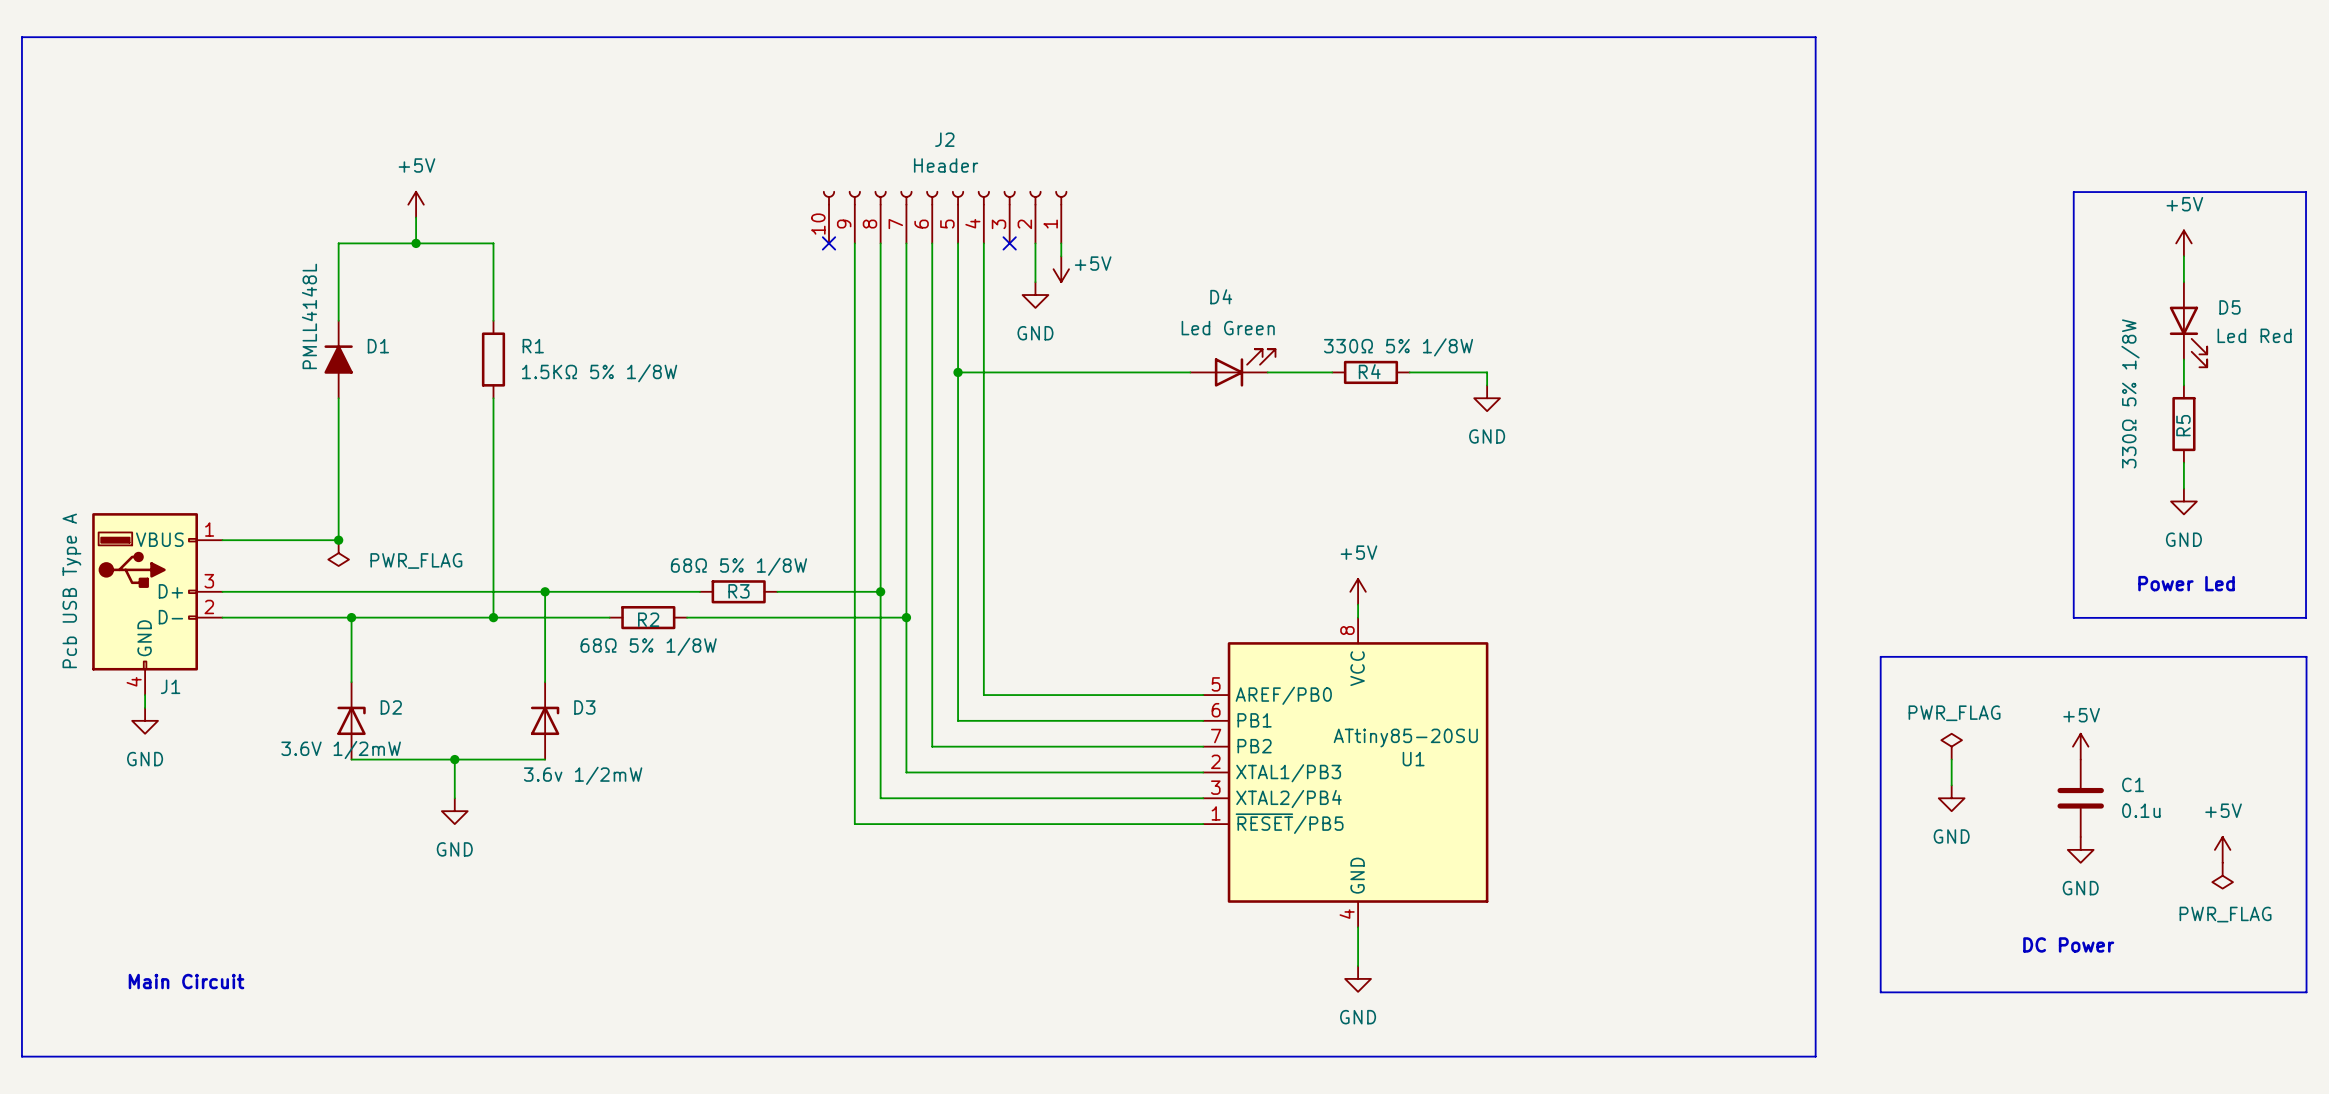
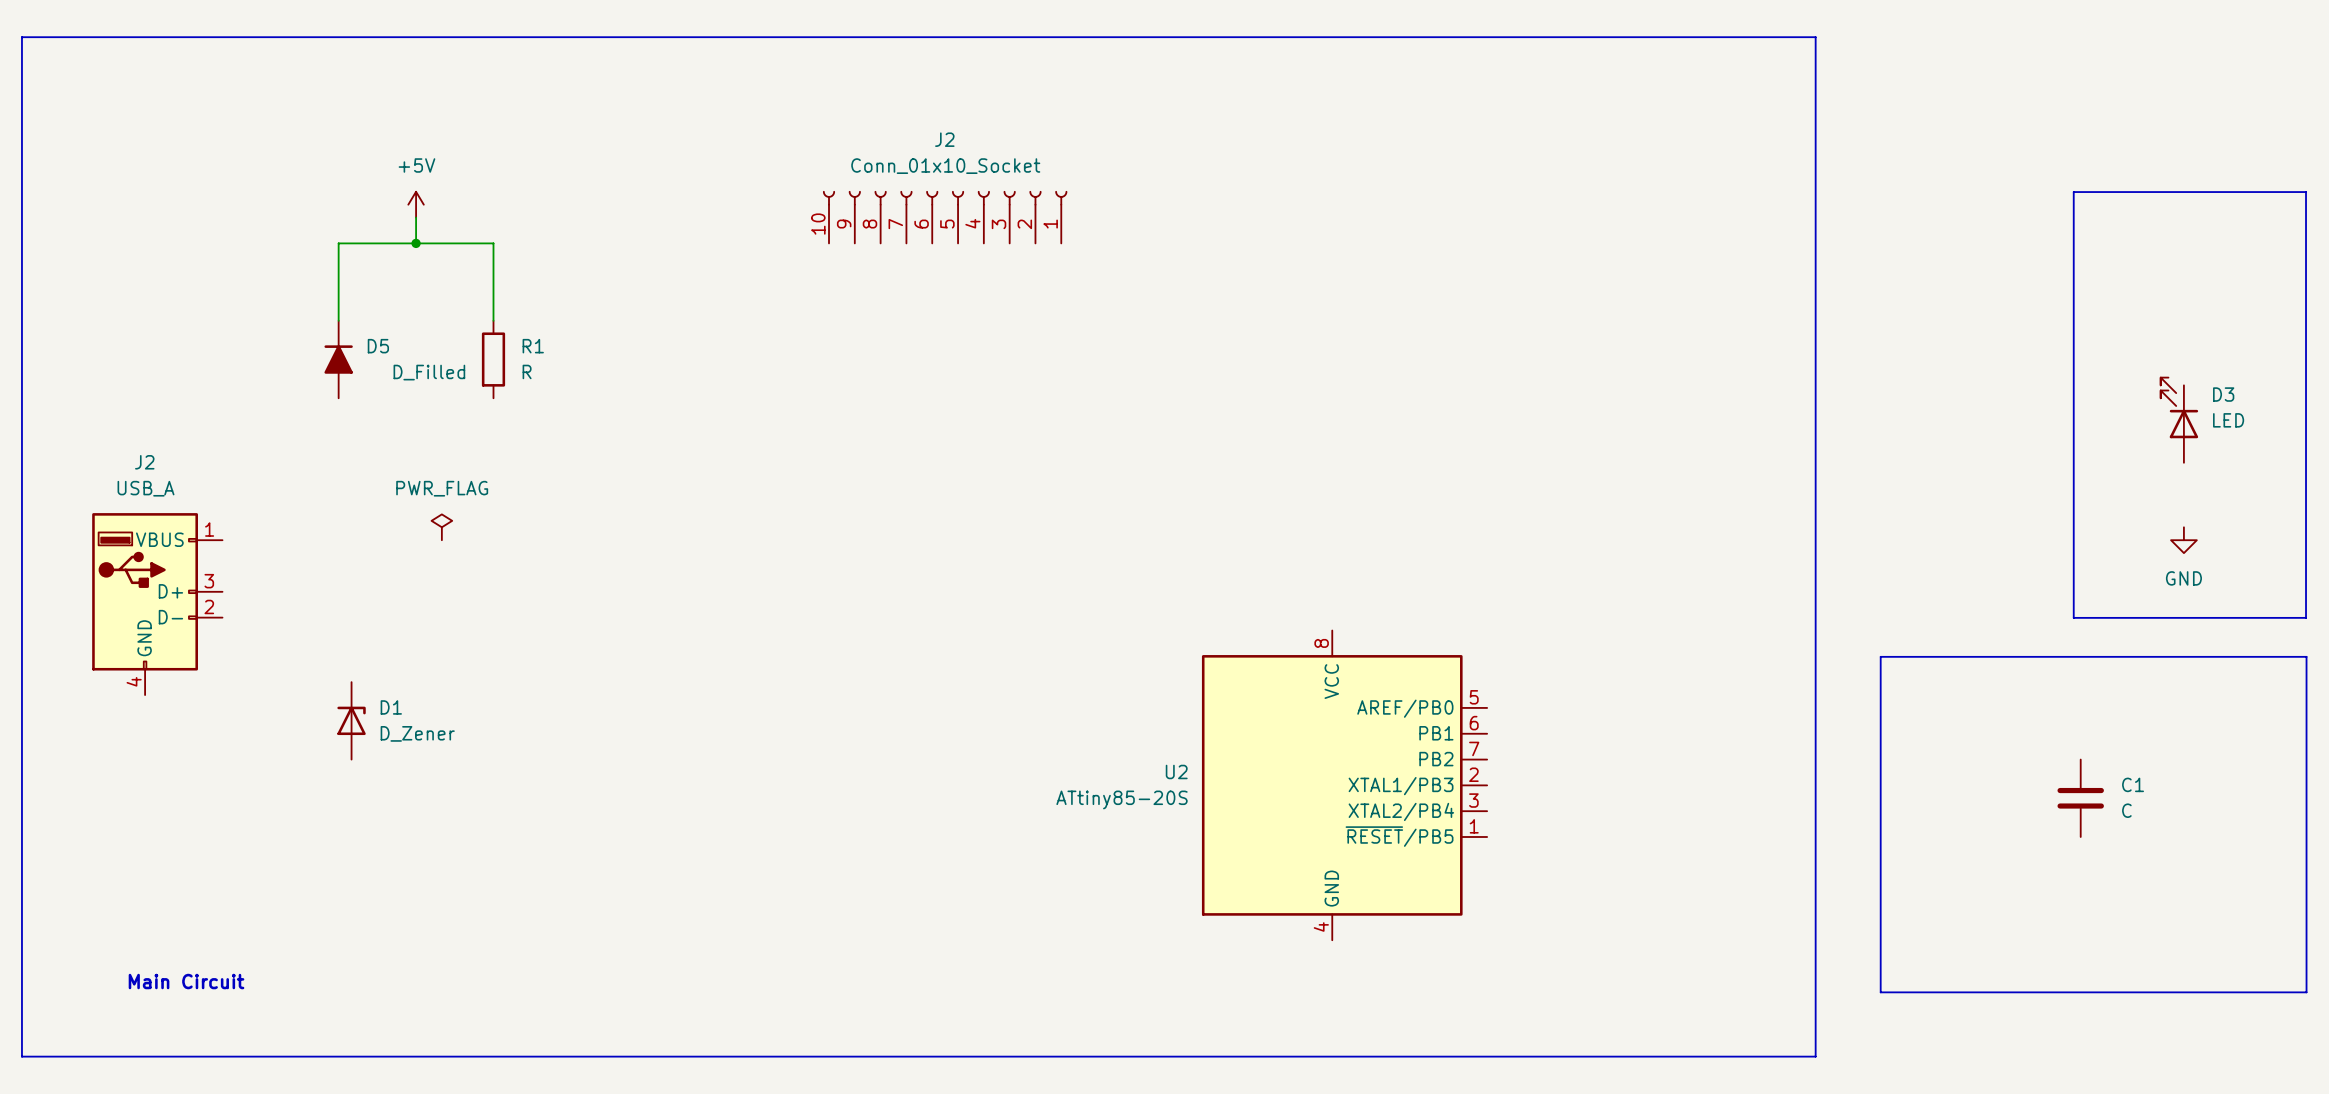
J2 value: Header (946, 165) -> Conn_01x10_Socket (945, 166)
no-connect mark: (829, 243) -> none
wire: (854, 243) (854, 824) (1203, 824) -> none
wire: (880, 243) (880, 798) (1203, 798) -> none
wire: (906, 243) (906, 772) (1203, 772) -> none
wire: (932, 243) (932, 746) (1203, 746) -> none
wire: (958, 243) (958, 720) (1203, 720) -> none
wire: (983, 243) (983, 695) (1203, 695) -> none
no-connect mark: (1009, 243) -> none
wire: (1035, 243) (1035, 282) -> none
wire: (1061, 243) (1061, 256) -> none
power symbol: +5V (2183, 243) -> none
wire: (2183, 256) (2183, 282) -> none
power symbol: +5V (1061, 269) -> none
power symbol: GND (1035, 295) -> none
D1 value: PMLL4148L (309, 316) -> D_Filled (429, 372)
D5: Led Red (2188, 324) -> none
D1 name: D1 (378, 346) -> D5 (378, 346)
wire: (2183, 359) (2183, 385) -> none
D4: Led Green (1232, 367) -> none
wire: (958, 372) (1190, 372) -> none
junction: (958, 372) -> none
wire: (1267, 372) (1332, 372) -> none
R4: 330Ω 5% 1/8W (1370, 372) -> none
wire: (1409, 372) (1487, 372) (1487, 385) -> none
R1 value: 1.5KΩ 5% 1/8W (599, 373) -> R (527, 371)
wire: (338, 398) (338, 540) (222, 540) -> none
wire: (493, 398) (493, 617) -> none
power symbol: GND (1487, 398) -> none
R5: 330Ω 5% 1/8W (2183, 424) -> none
wire: (2183, 462) (2183, 488) -> none
power symbol position: GND (2183, 501) -> GND (2183, 540)
junction: (338, 540) -> none
power symbol rotation: 0° (338, 553) -> 180° (441, 527)
power symbol position: PWR_FLAG (338, 553) -> PWR_FLAG (441, 527)
power symbol text position: PWR_FLAG (416, 560) -> PWR_FLAG (442, 488)
text: Power Led (2186, 583) -> none
J1 value: Pcb USB Type A (71, 590) -> USB_A (146, 488)
wire: (222, 591) (699, 591) -> none
wire: (545, 591) (545, 682) -> none
junction: (545, 591) -> none
R3: 68Ω 5% 1/8W (738, 591) -> none
wire: (777, 591) (880, 591) -> none
junction: (880, 591) -> none
power symbol: +5V (1358, 591) -> none
wire: (1358, 604) (1358, 617) -> none
wire: (222, 617) (609, 617) -> none
wire: (351, 617) (351, 682) -> none
junction: (351, 617) -> none
junction: (493, 617) -> none
R2: 68Ω 5% 1/8W (648, 617) -> none
wire: (687, 617) (906, 617) -> none
junction: (906, 617) -> none
D3 symbol: [530, 682, 560, 760] -> [2160, 377, 2199, 463]
J1 name: J1 (170, 686) -> J2 (144, 462)
wire: (145, 695) (145, 707) -> none
D2 name: D2 (391, 707) -> D1 (391, 707)
power symbol: GND (145, 720) -> none
power symbol: PWR_FLAG (1951, 746) -> none
power symbol: +5V (2080, 746) -> none
D2 value: 3.6V 1/2mW (341, 749) -> D_Zener (417, 733)
wire: (351, 759) (545, 759) -> none
wire: (454, 759) (454, 798) -> none
junction: (454, 759) -> none
wire: (1951, 759) (1951, 785) -> none
U1: ATtiny85-20SU (1345, 772) -> none
D3 value: 3.6v 1/2mW (583, 775) -> LED (2228, 420)
U2: none -> ATtiny85-20S (1344, 785)
power symbol: GND (1951, 798) -> none
C1 value: 0.1u (2141, 810) -> C (2126, 810)
power symbol: GND (454, 811) -> none
power symbol: GND (2080, 849) -> none
power symbol: +5V (2222, 849) -> none
power symbol: PWR_FLAG (2222, 875) -> none
wire: (1358, 927) (1358, 966) -> none
text: DC Power (2068, 944) -> none
power symbol: GND (1358, 978) -> none

